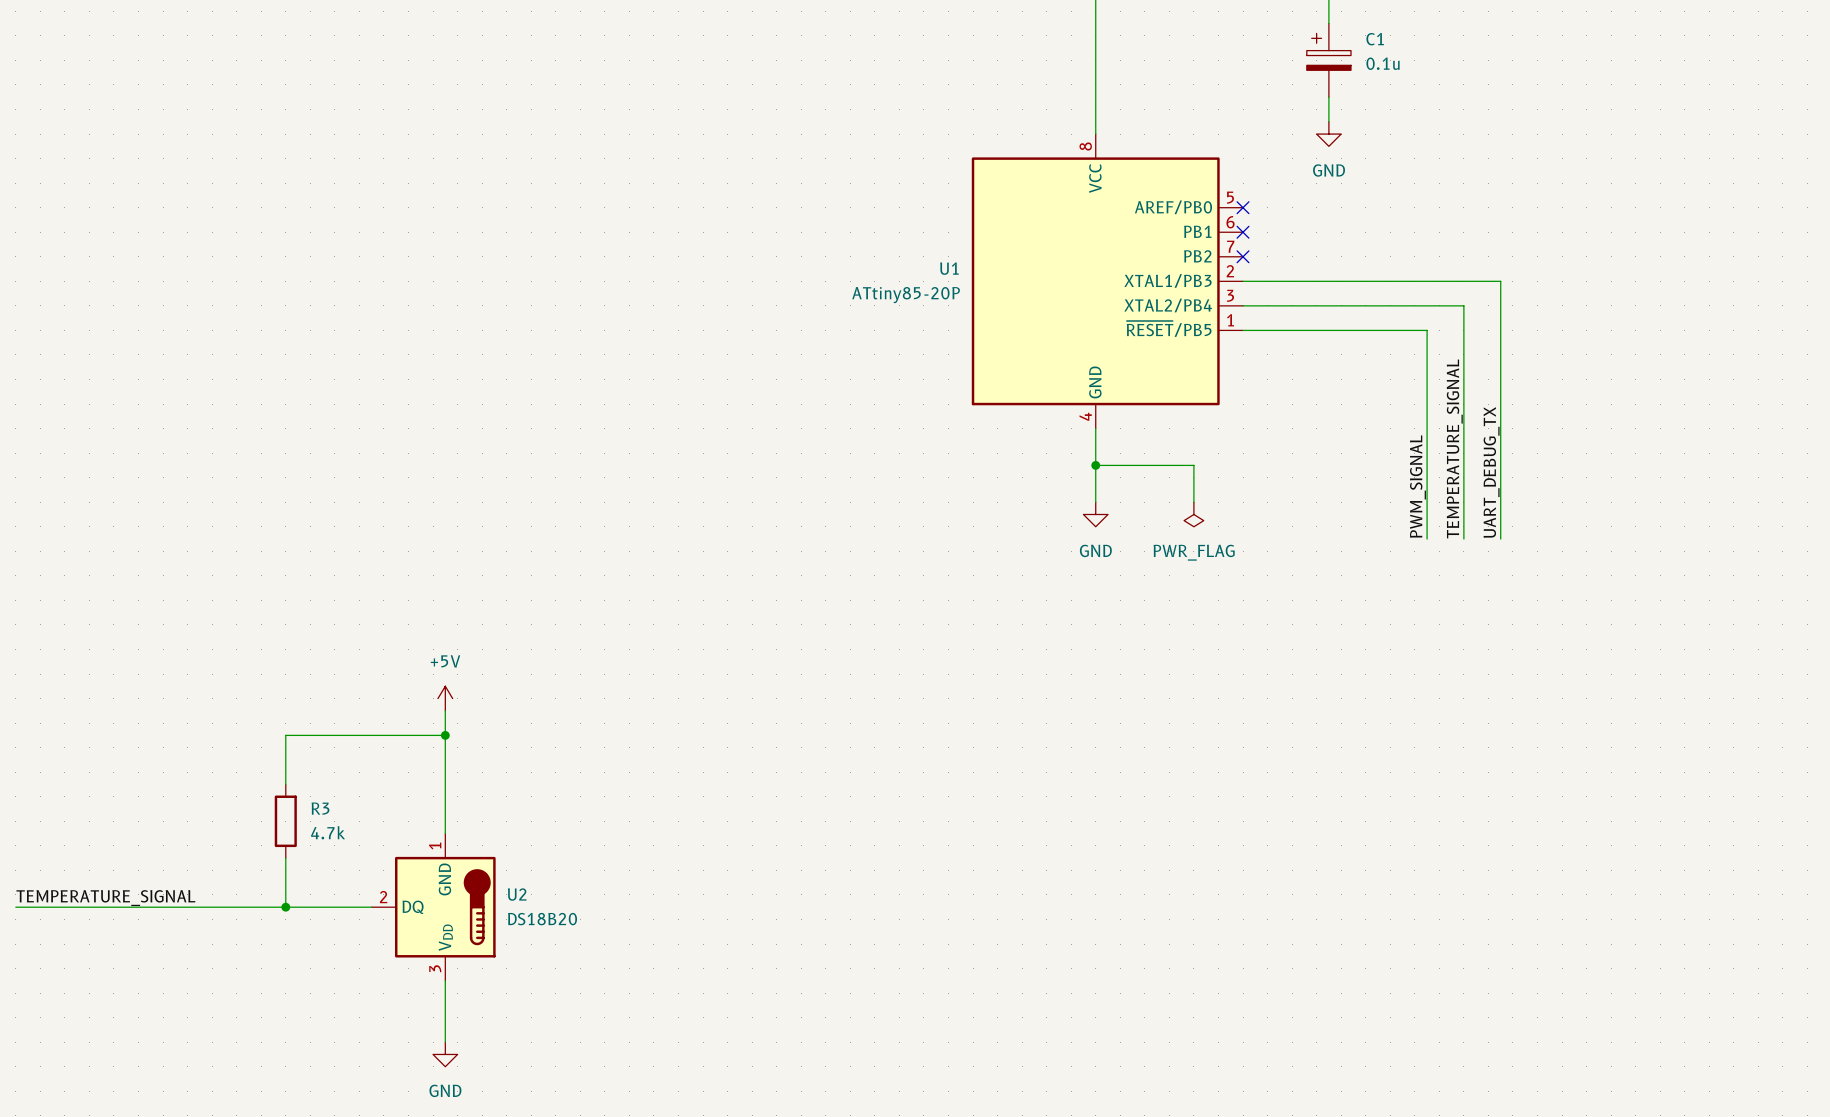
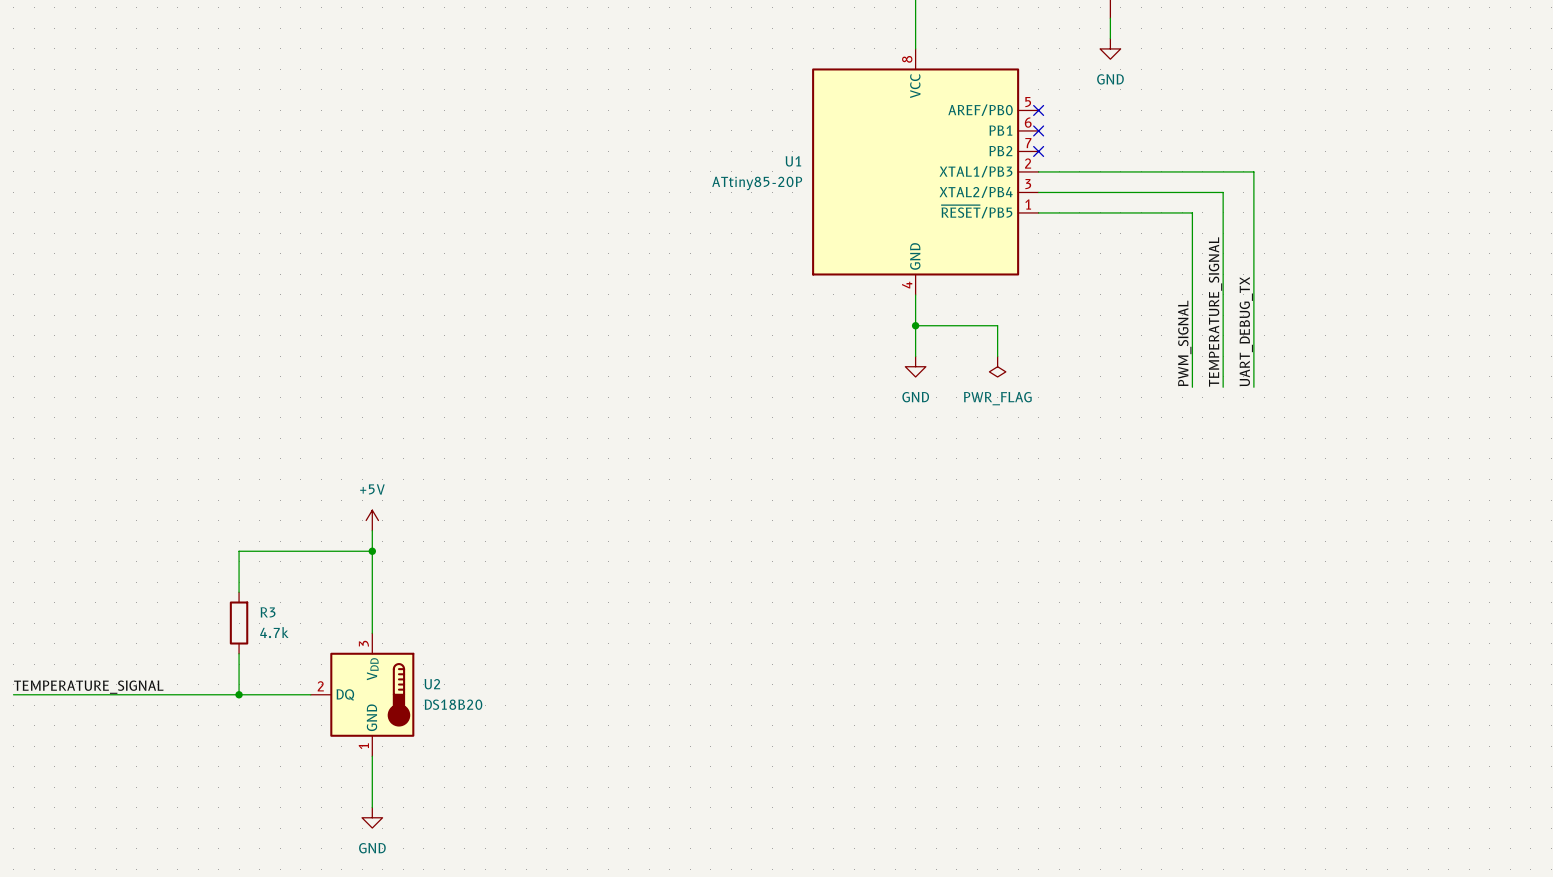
U2 flip: as is (445, 907) -> up-down (372, 694)

